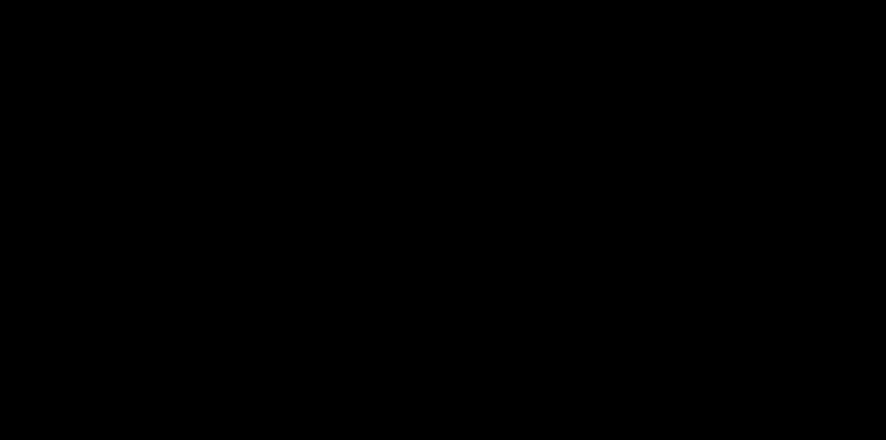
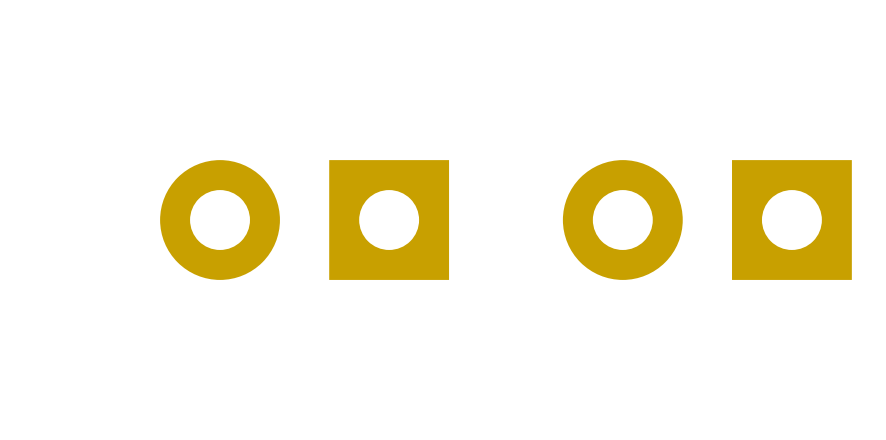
part: none -> (304, 220)
part: none -> (707, 220)

